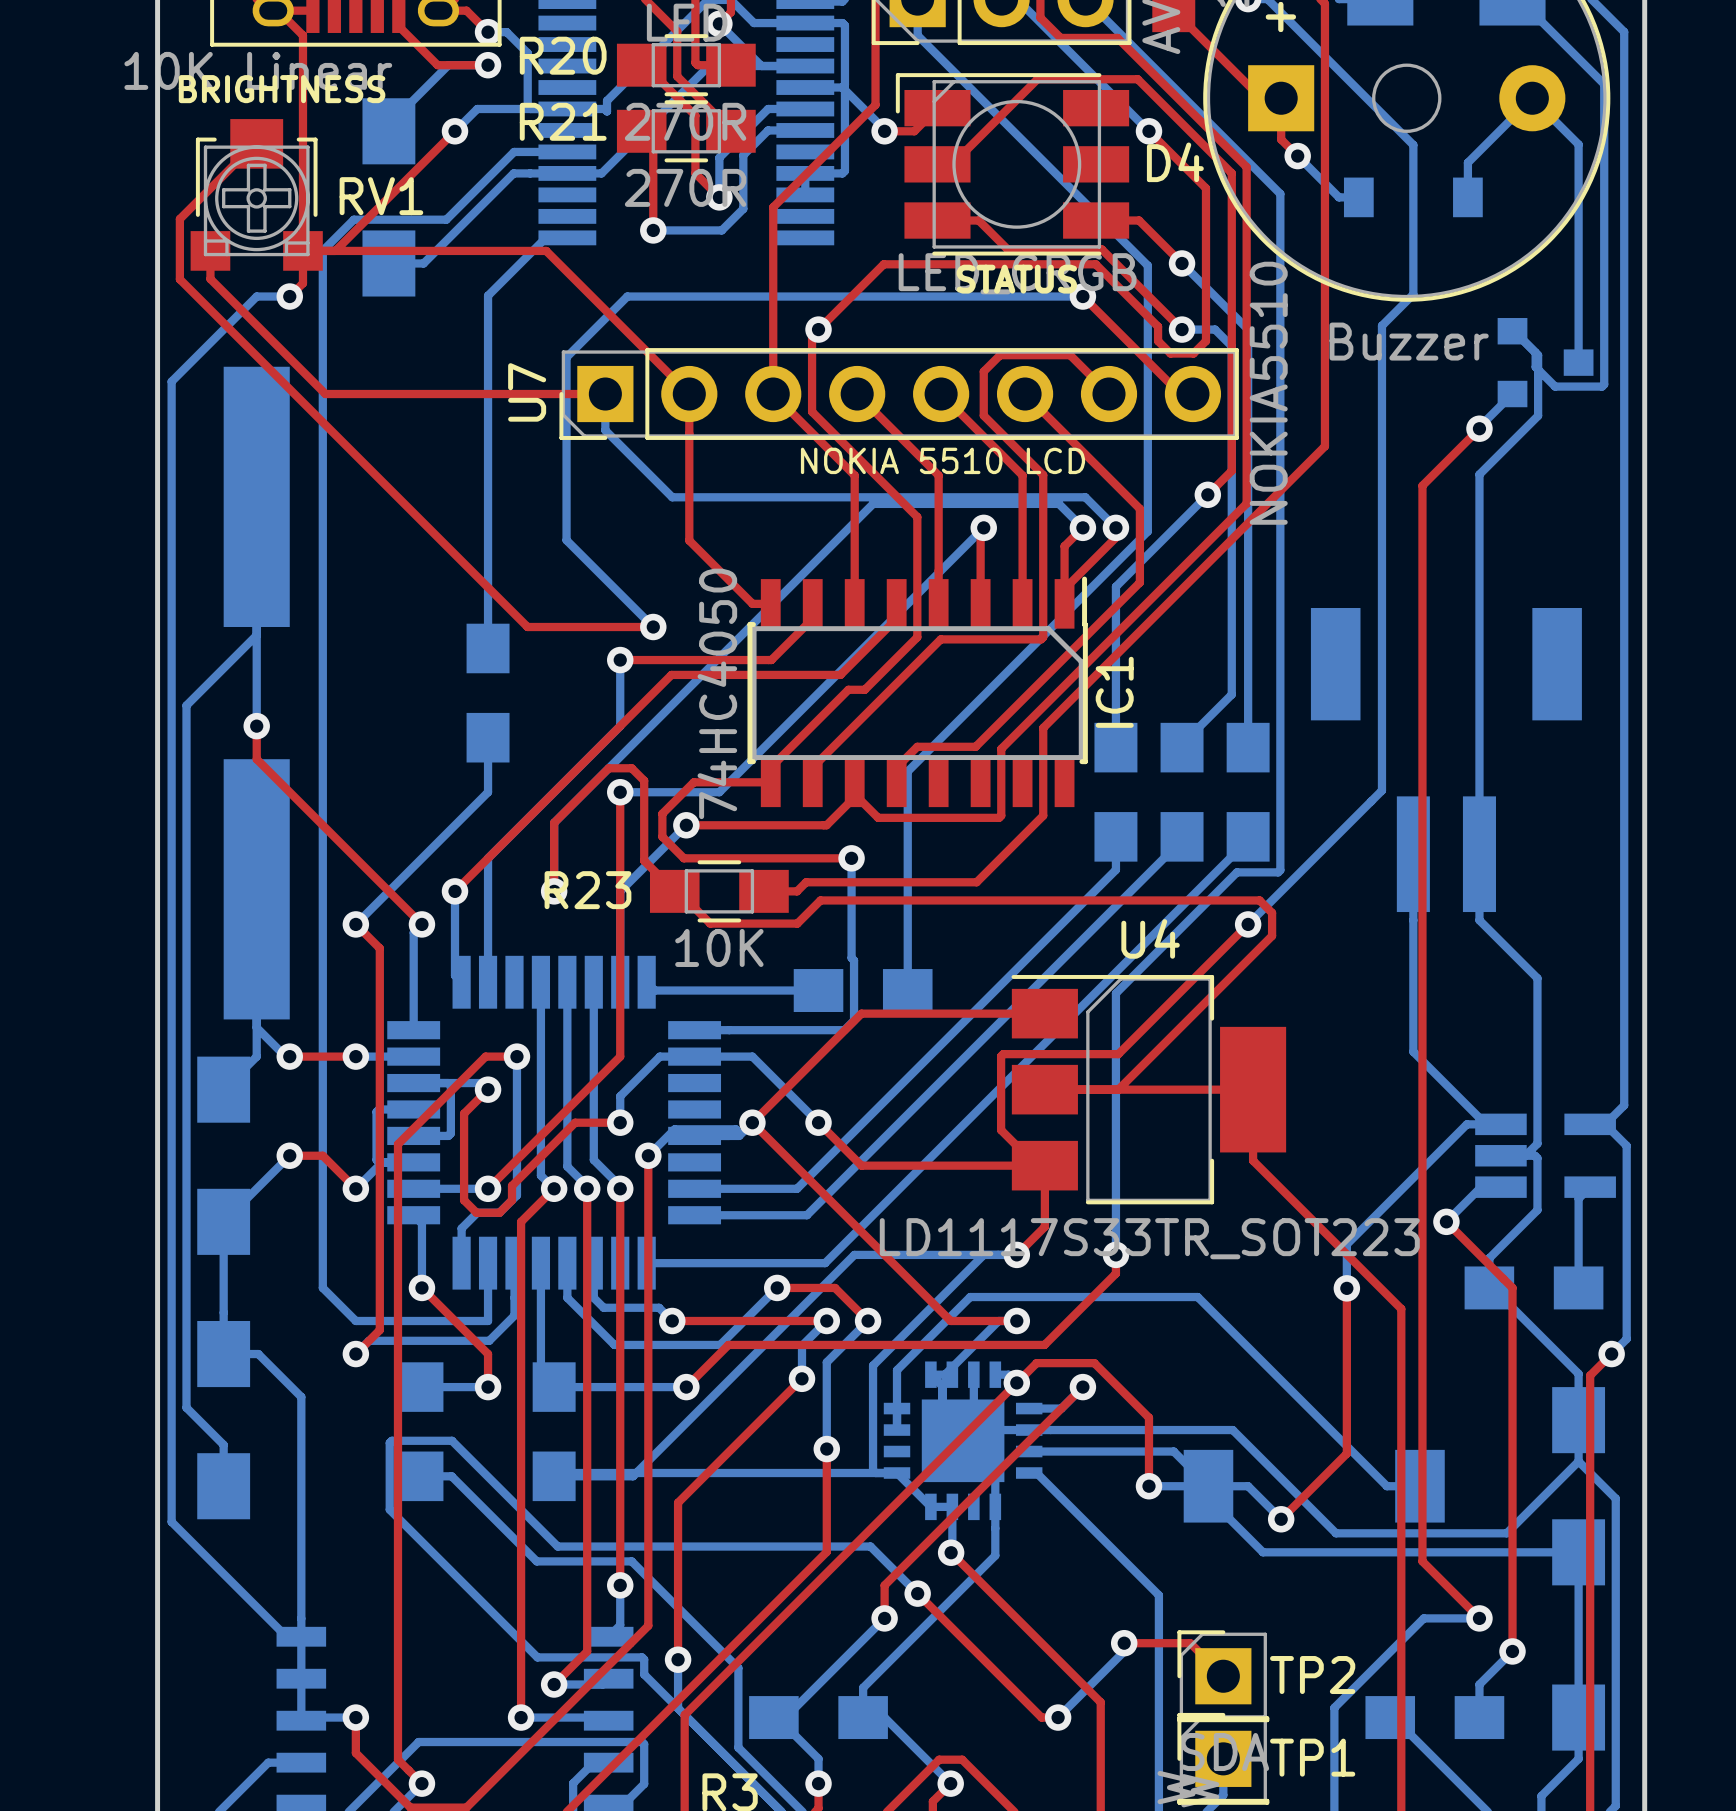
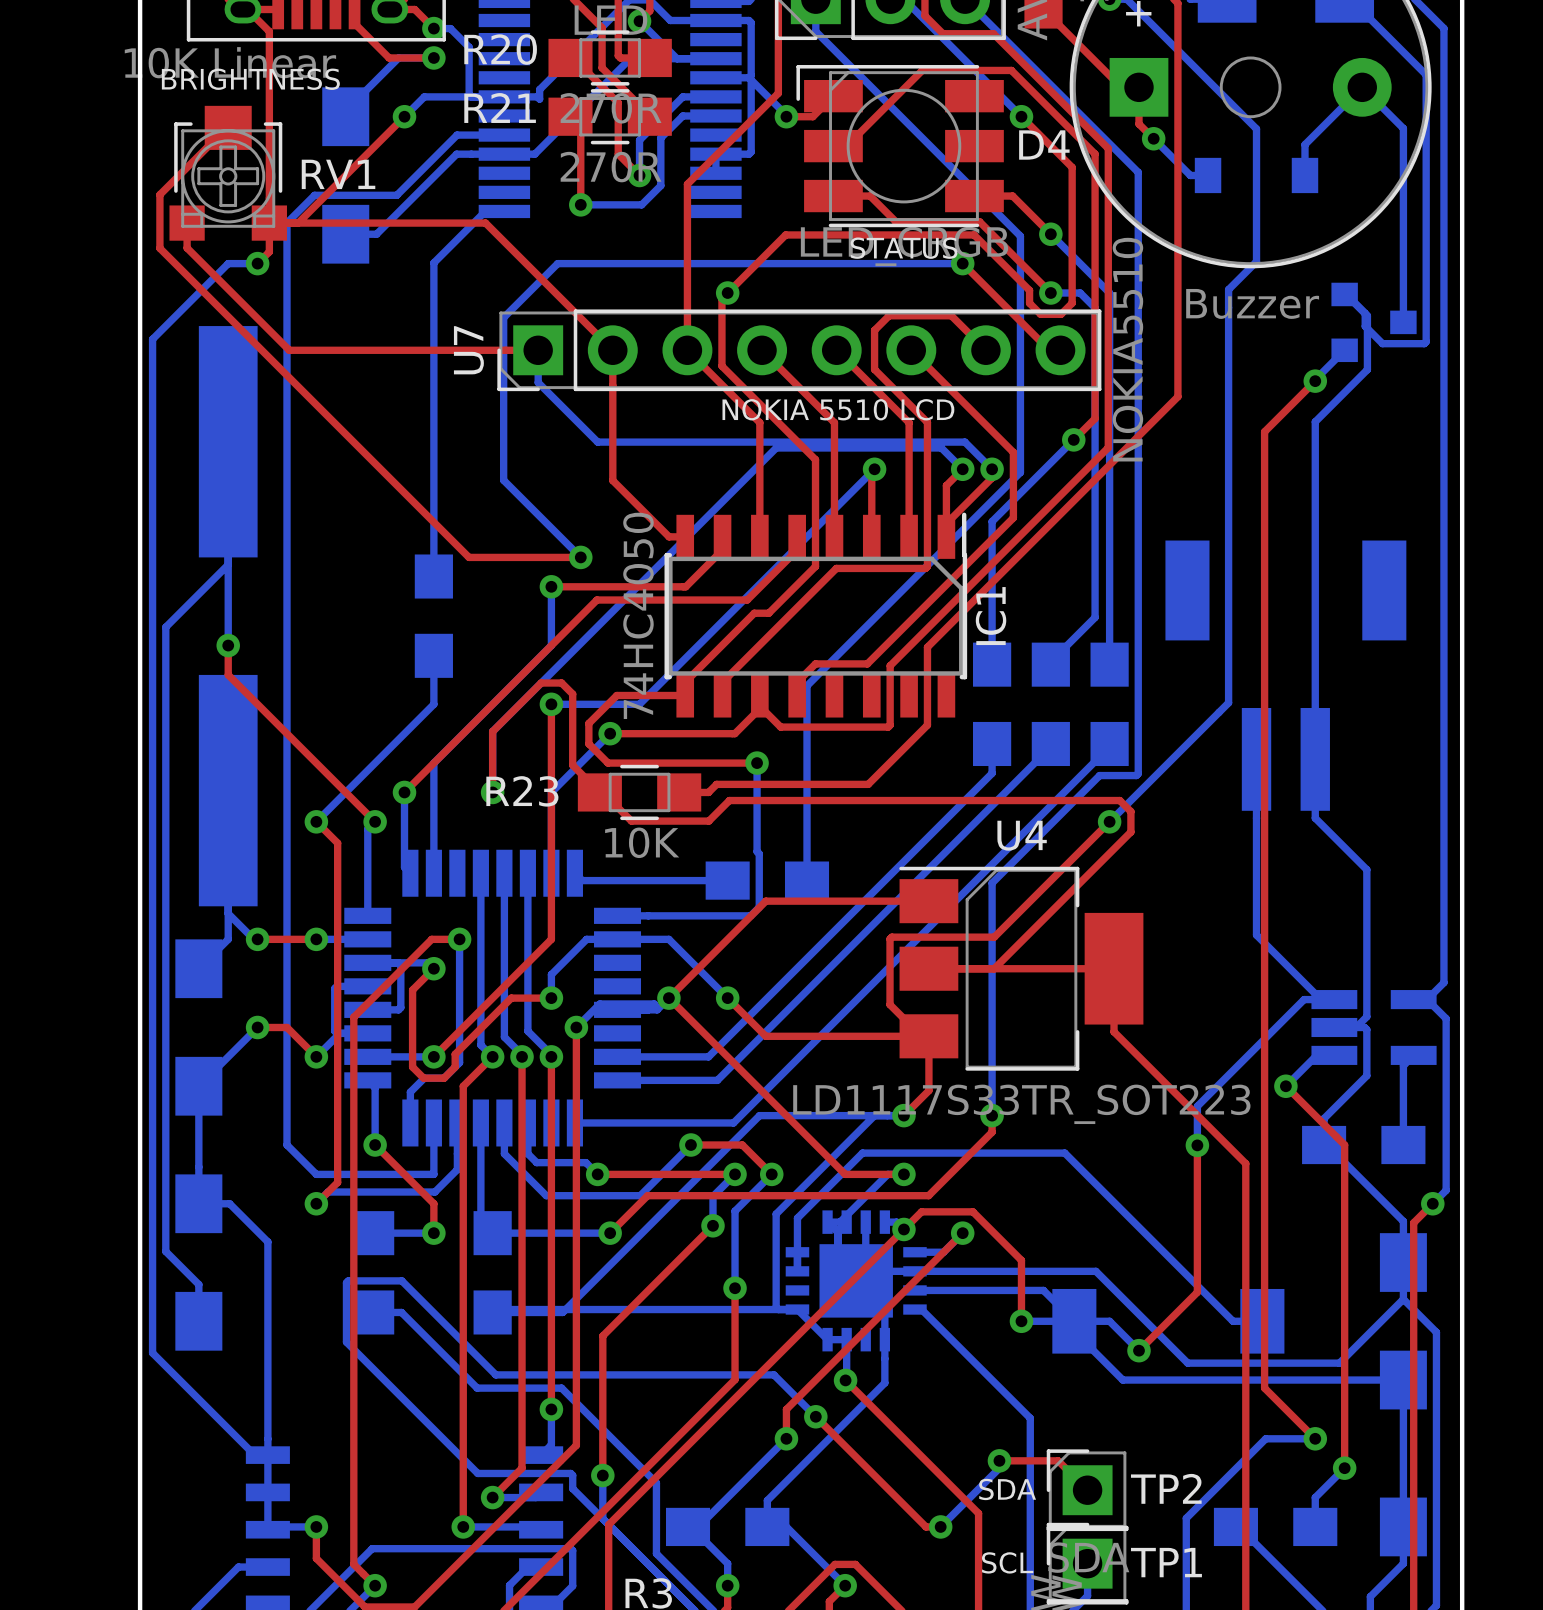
text: none -> SDA (1007, 1489)
text: none -> SCL (1007, 1562)

